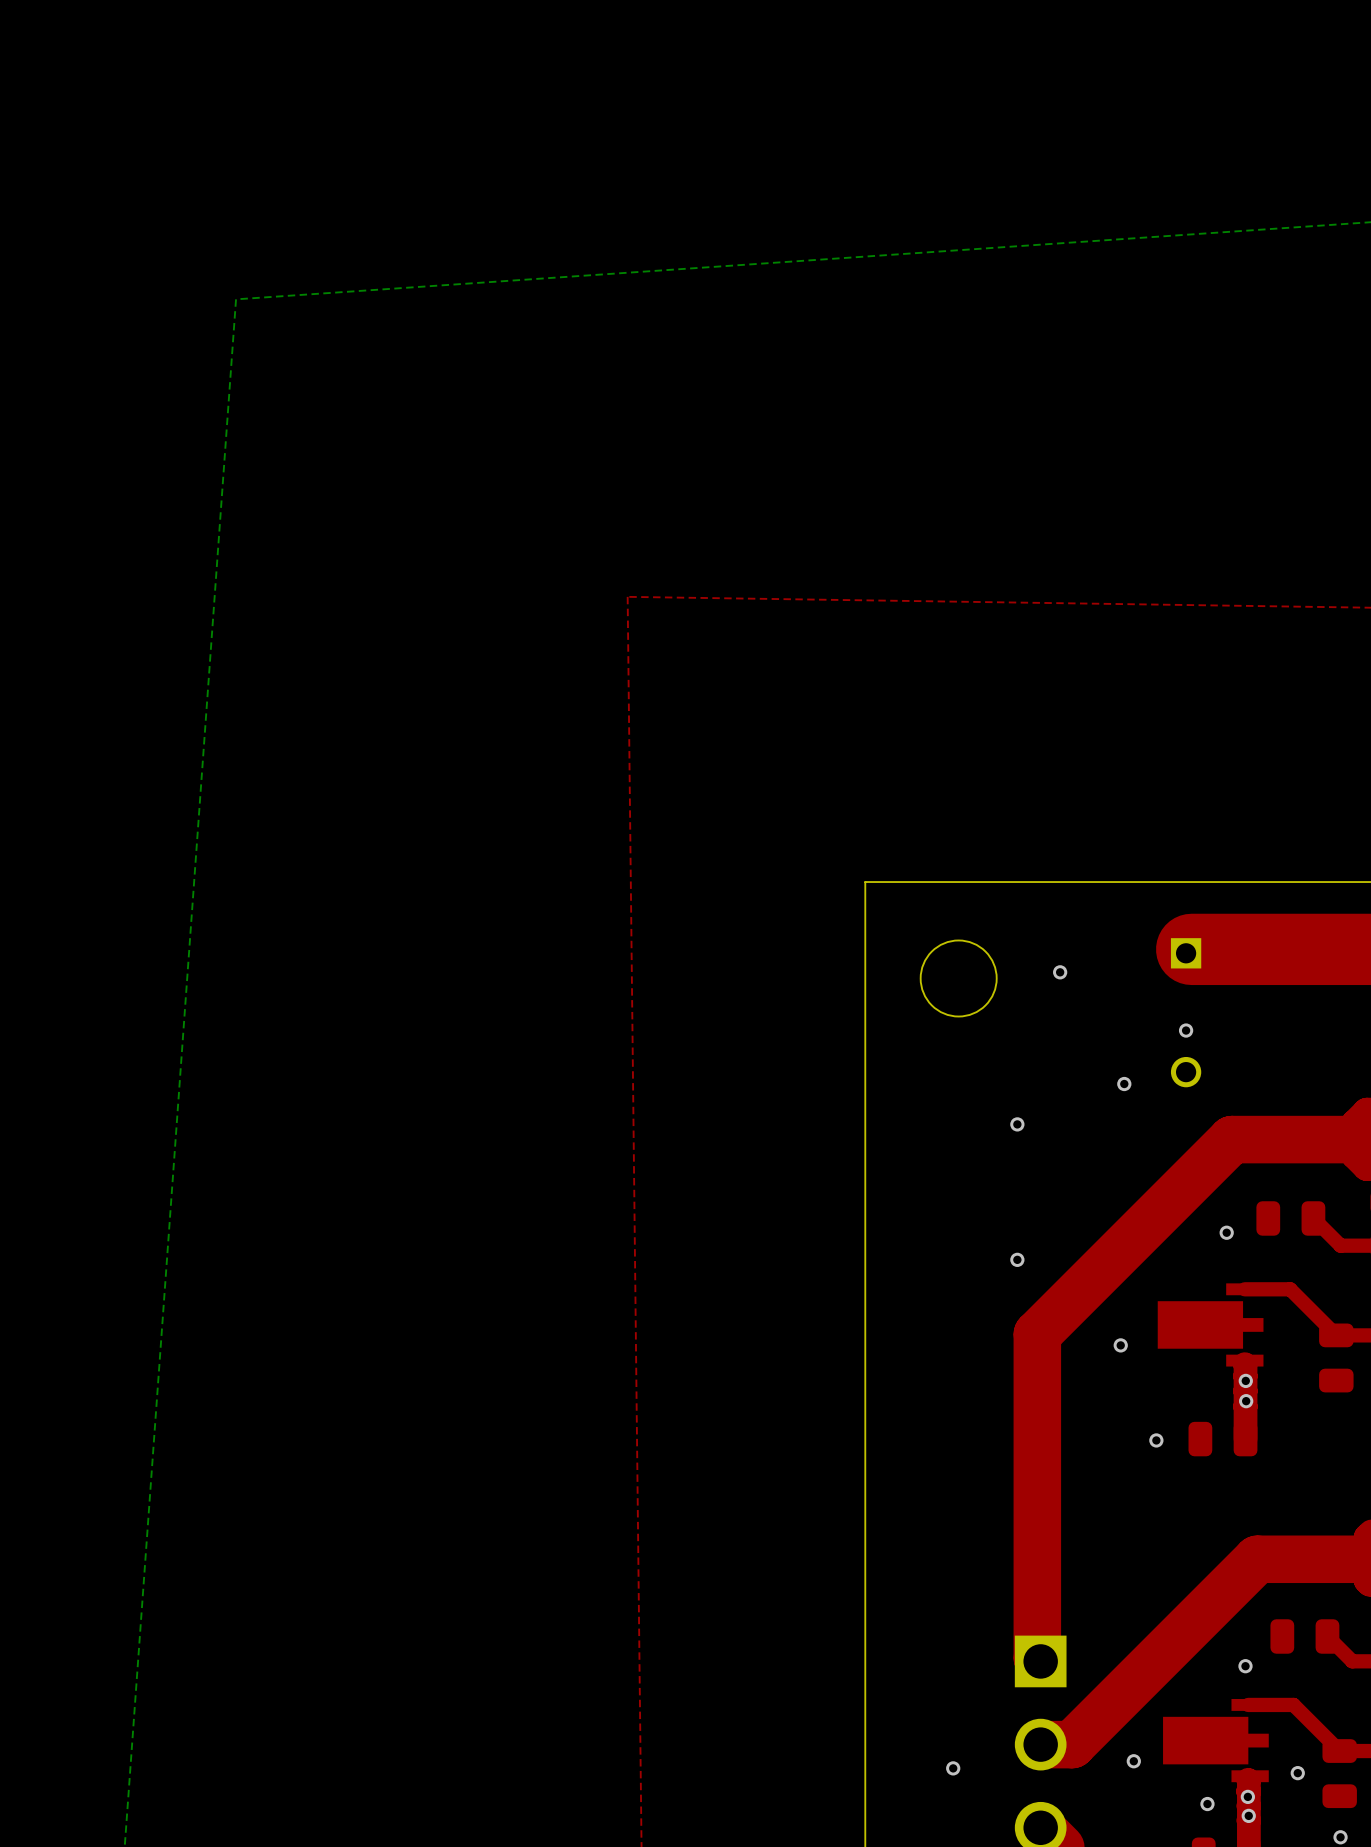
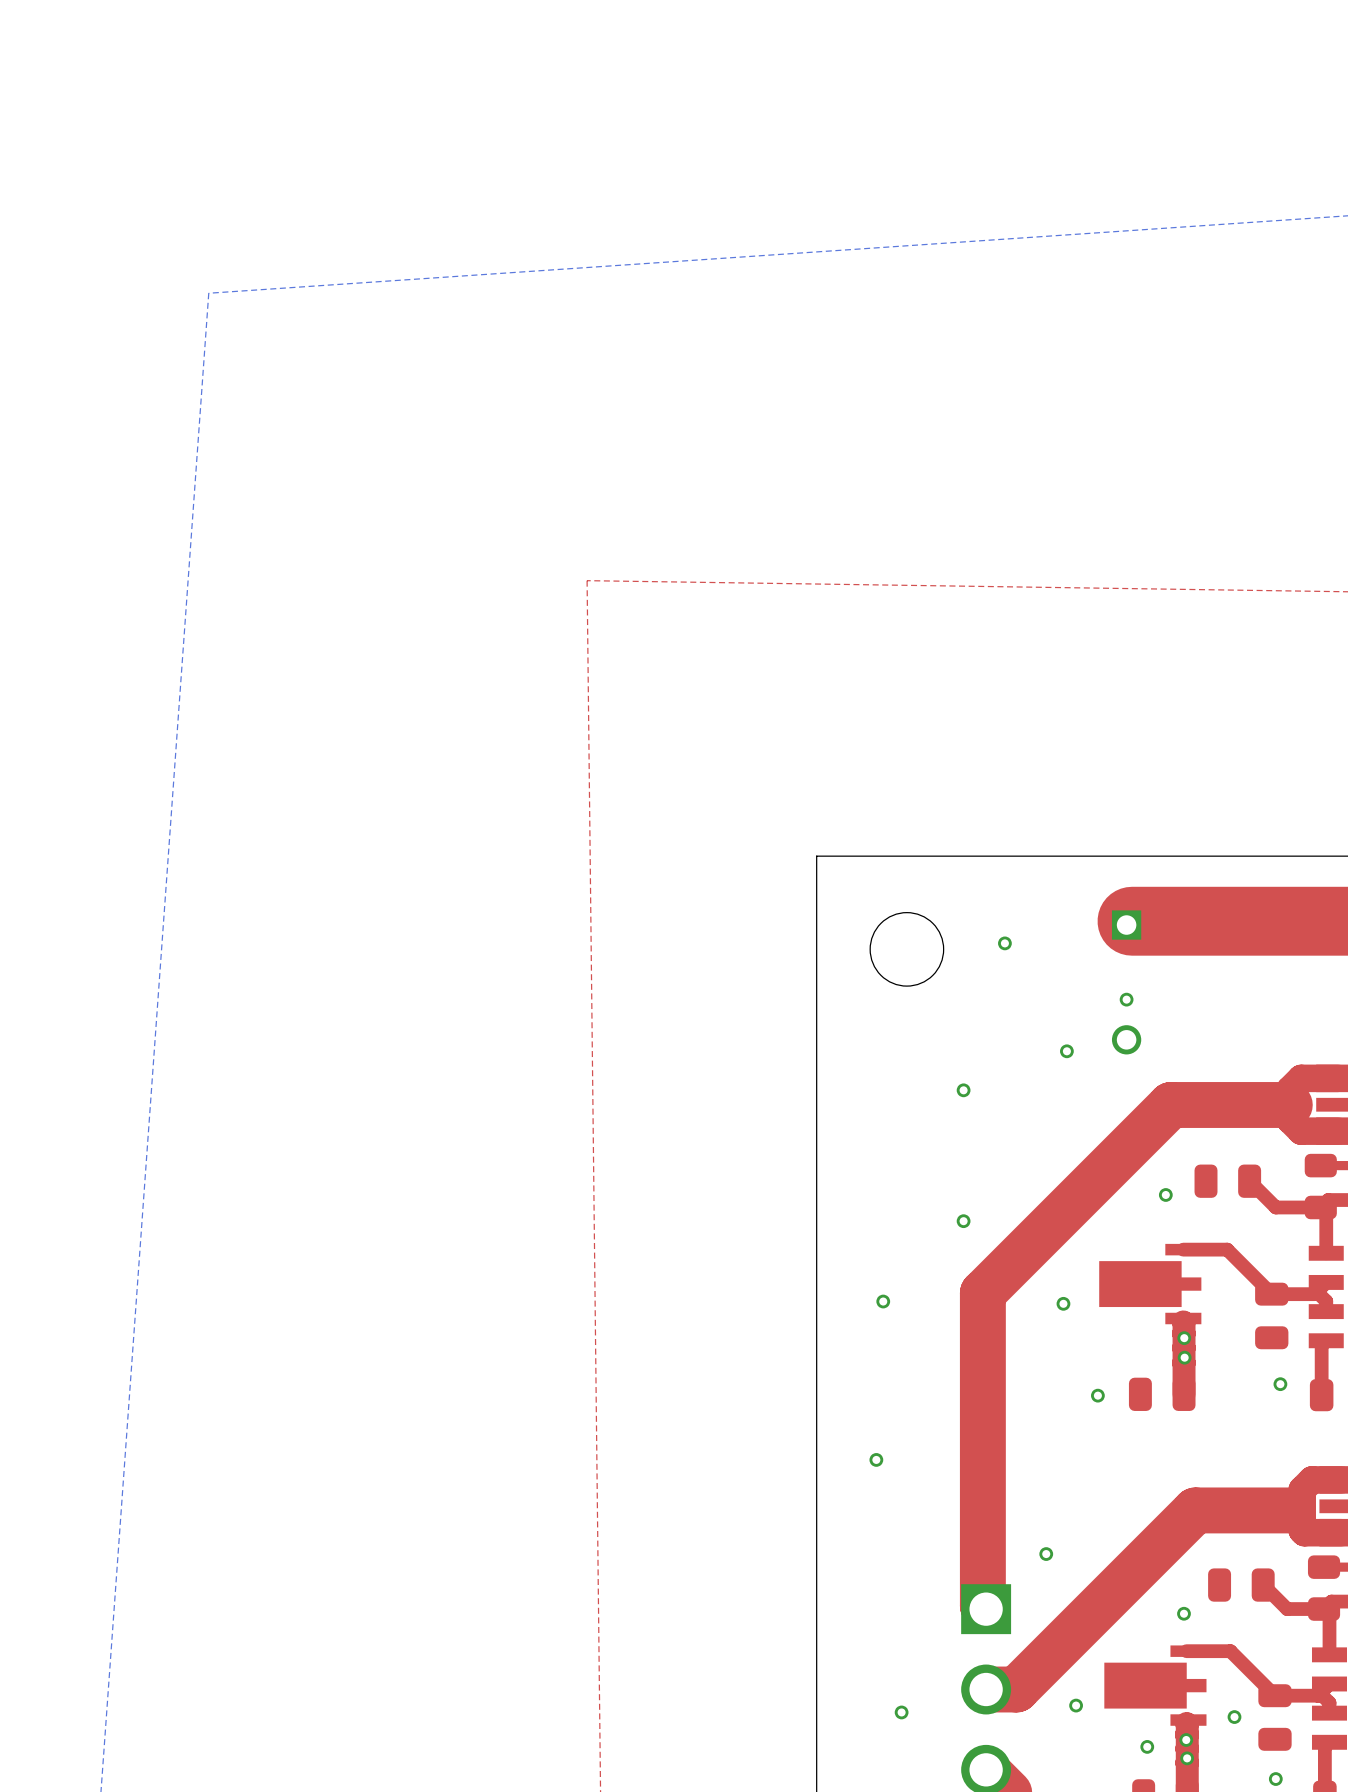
via: none -> (883, 1301)
via: none -> (1280, 1384)
via: none -> (876, 1459)
via: none -> (1046, 1554)

